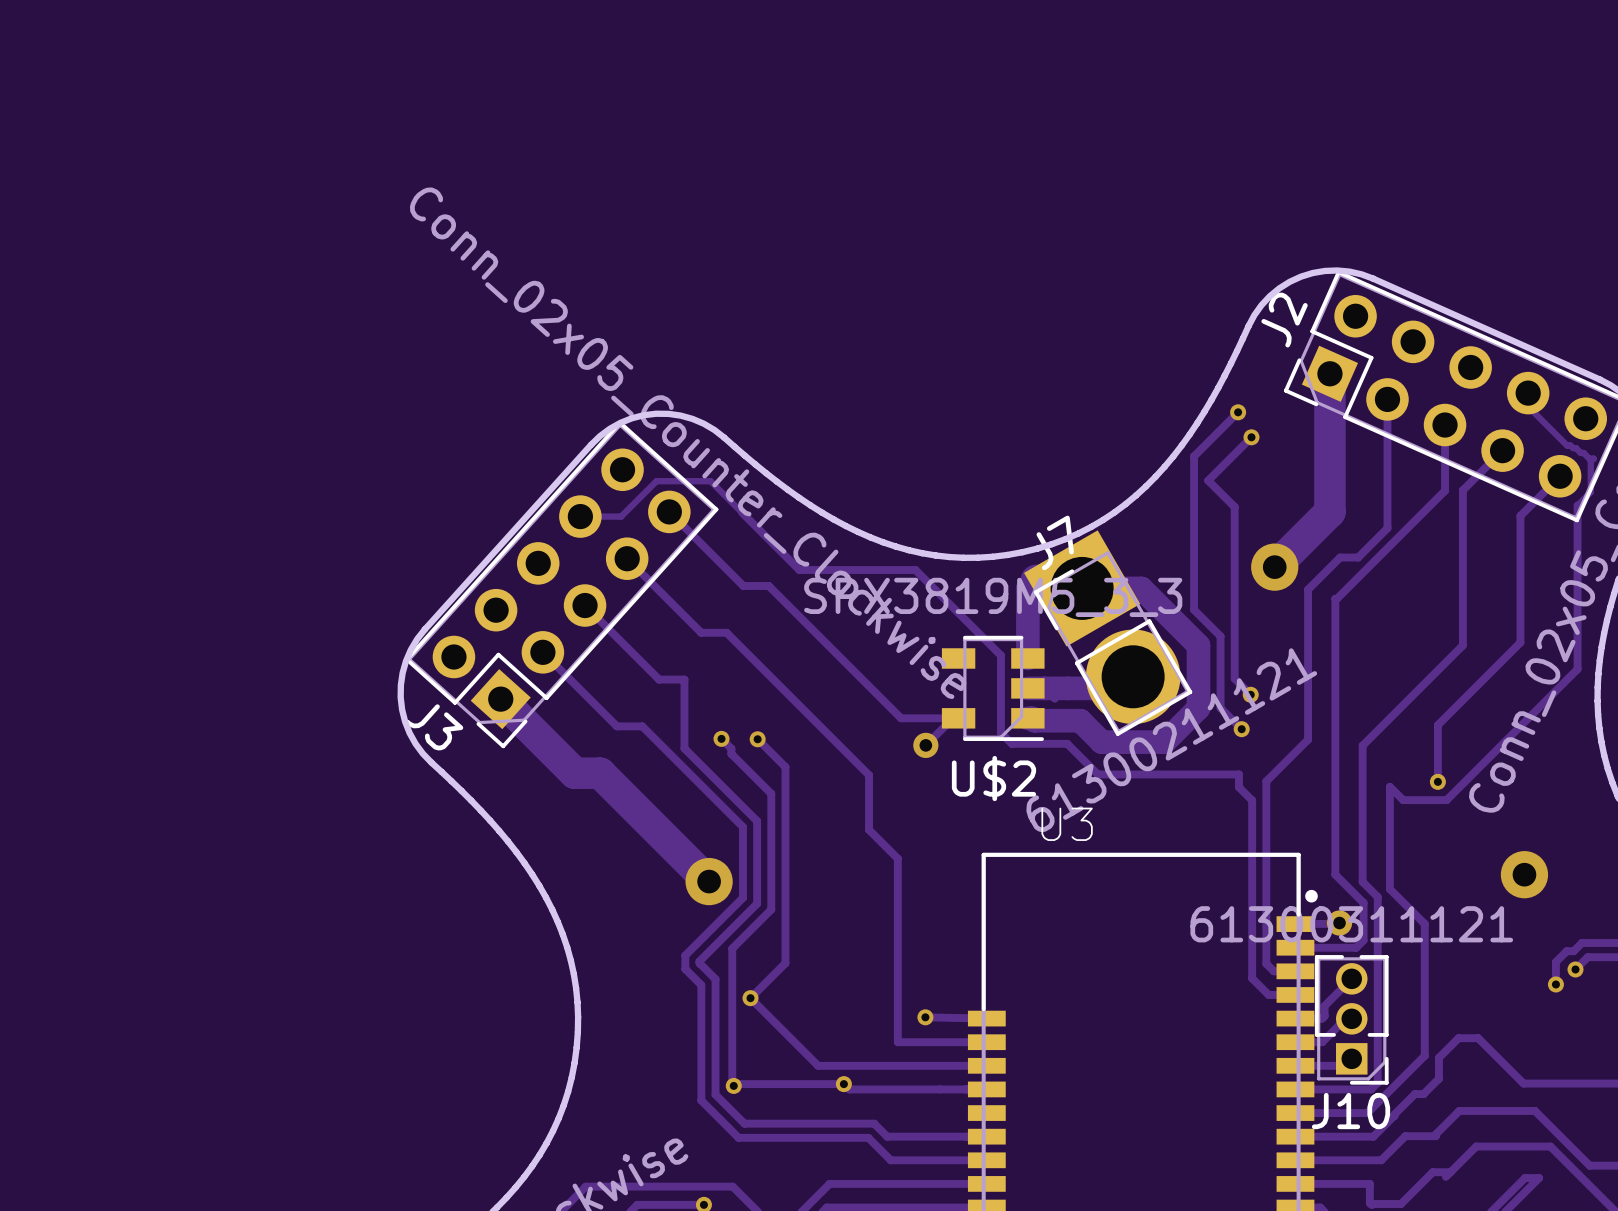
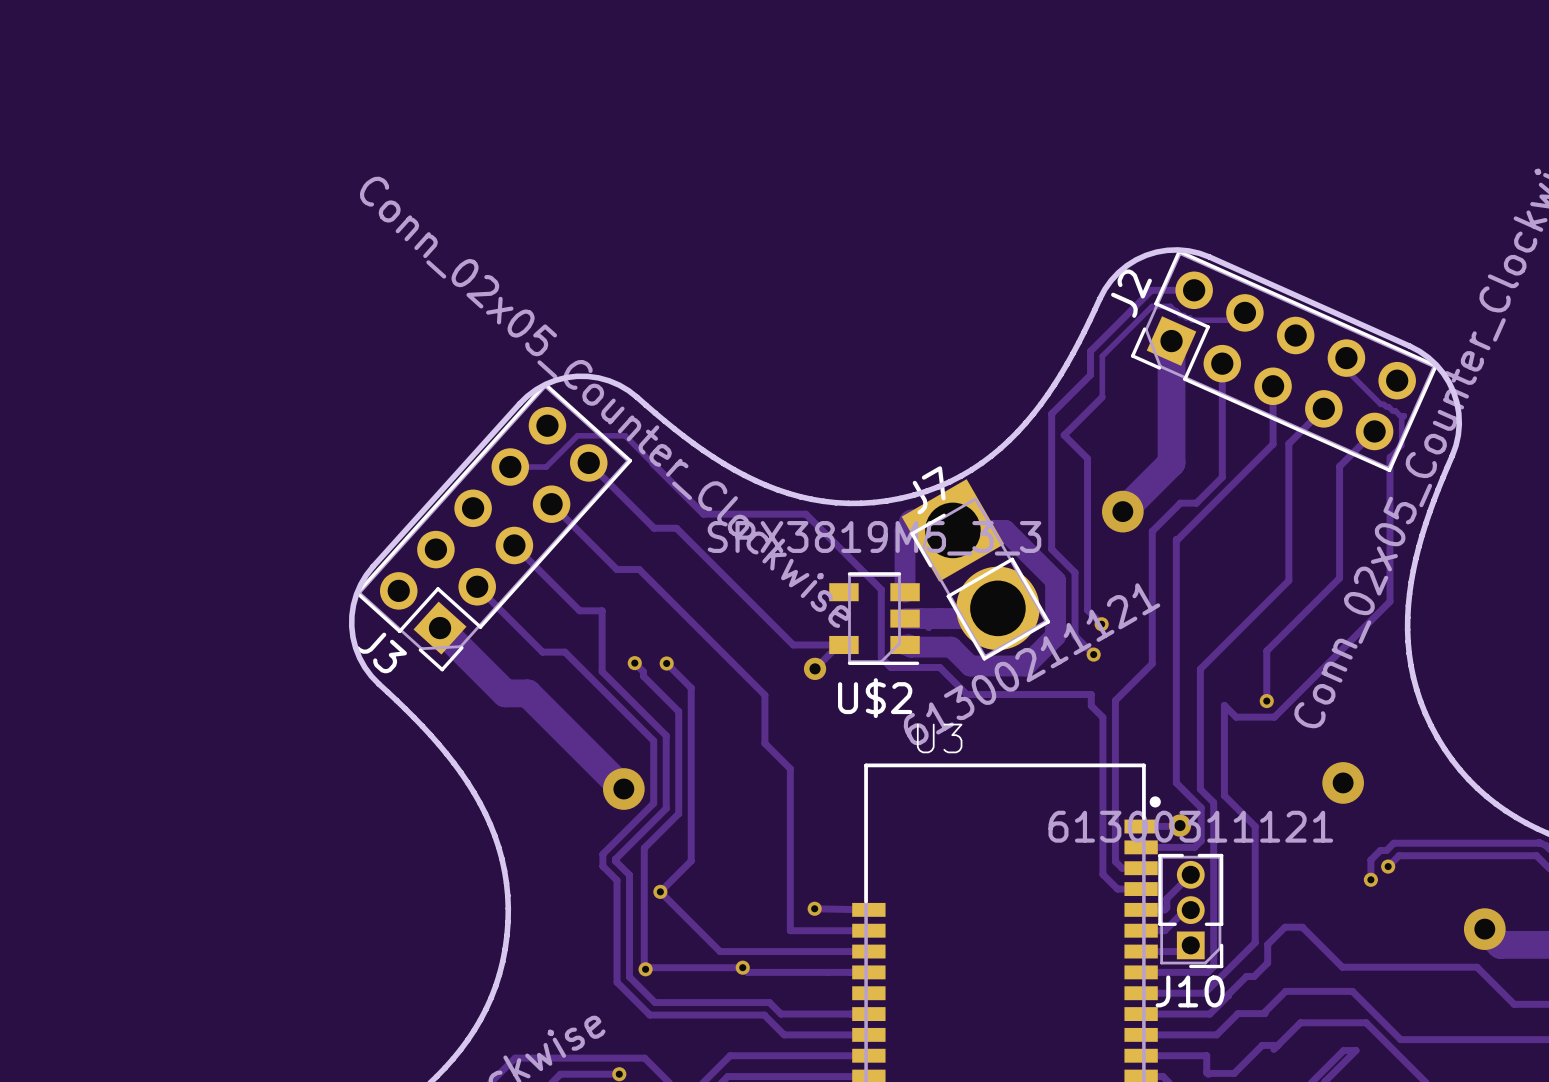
track: none -> (1194, 290) (1151, 290) (1090, 351) (1090, 375)
track: none -> (1232, 312) (1244, 312) (1237, 320) (1192, 320) (1180, 315) (1170, 306) (1152, 306) (1102, 356) (1102, 397)
via: (1238, 412) -> none
via: (1251, 437) -> none

